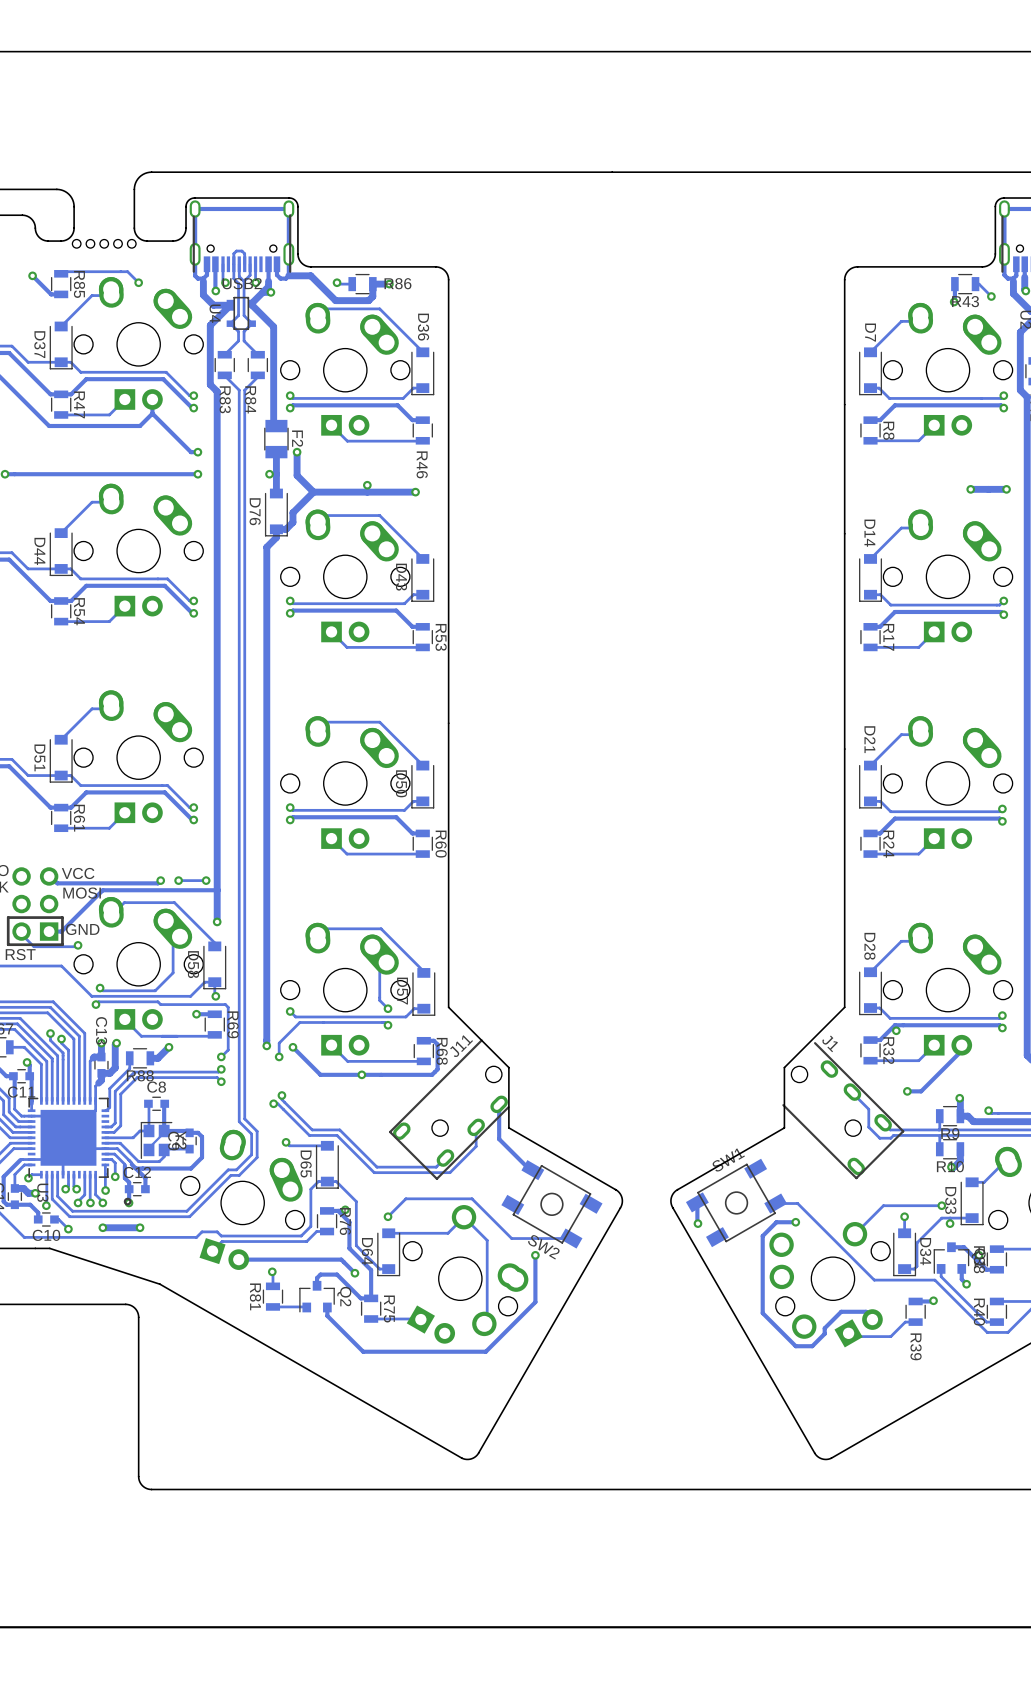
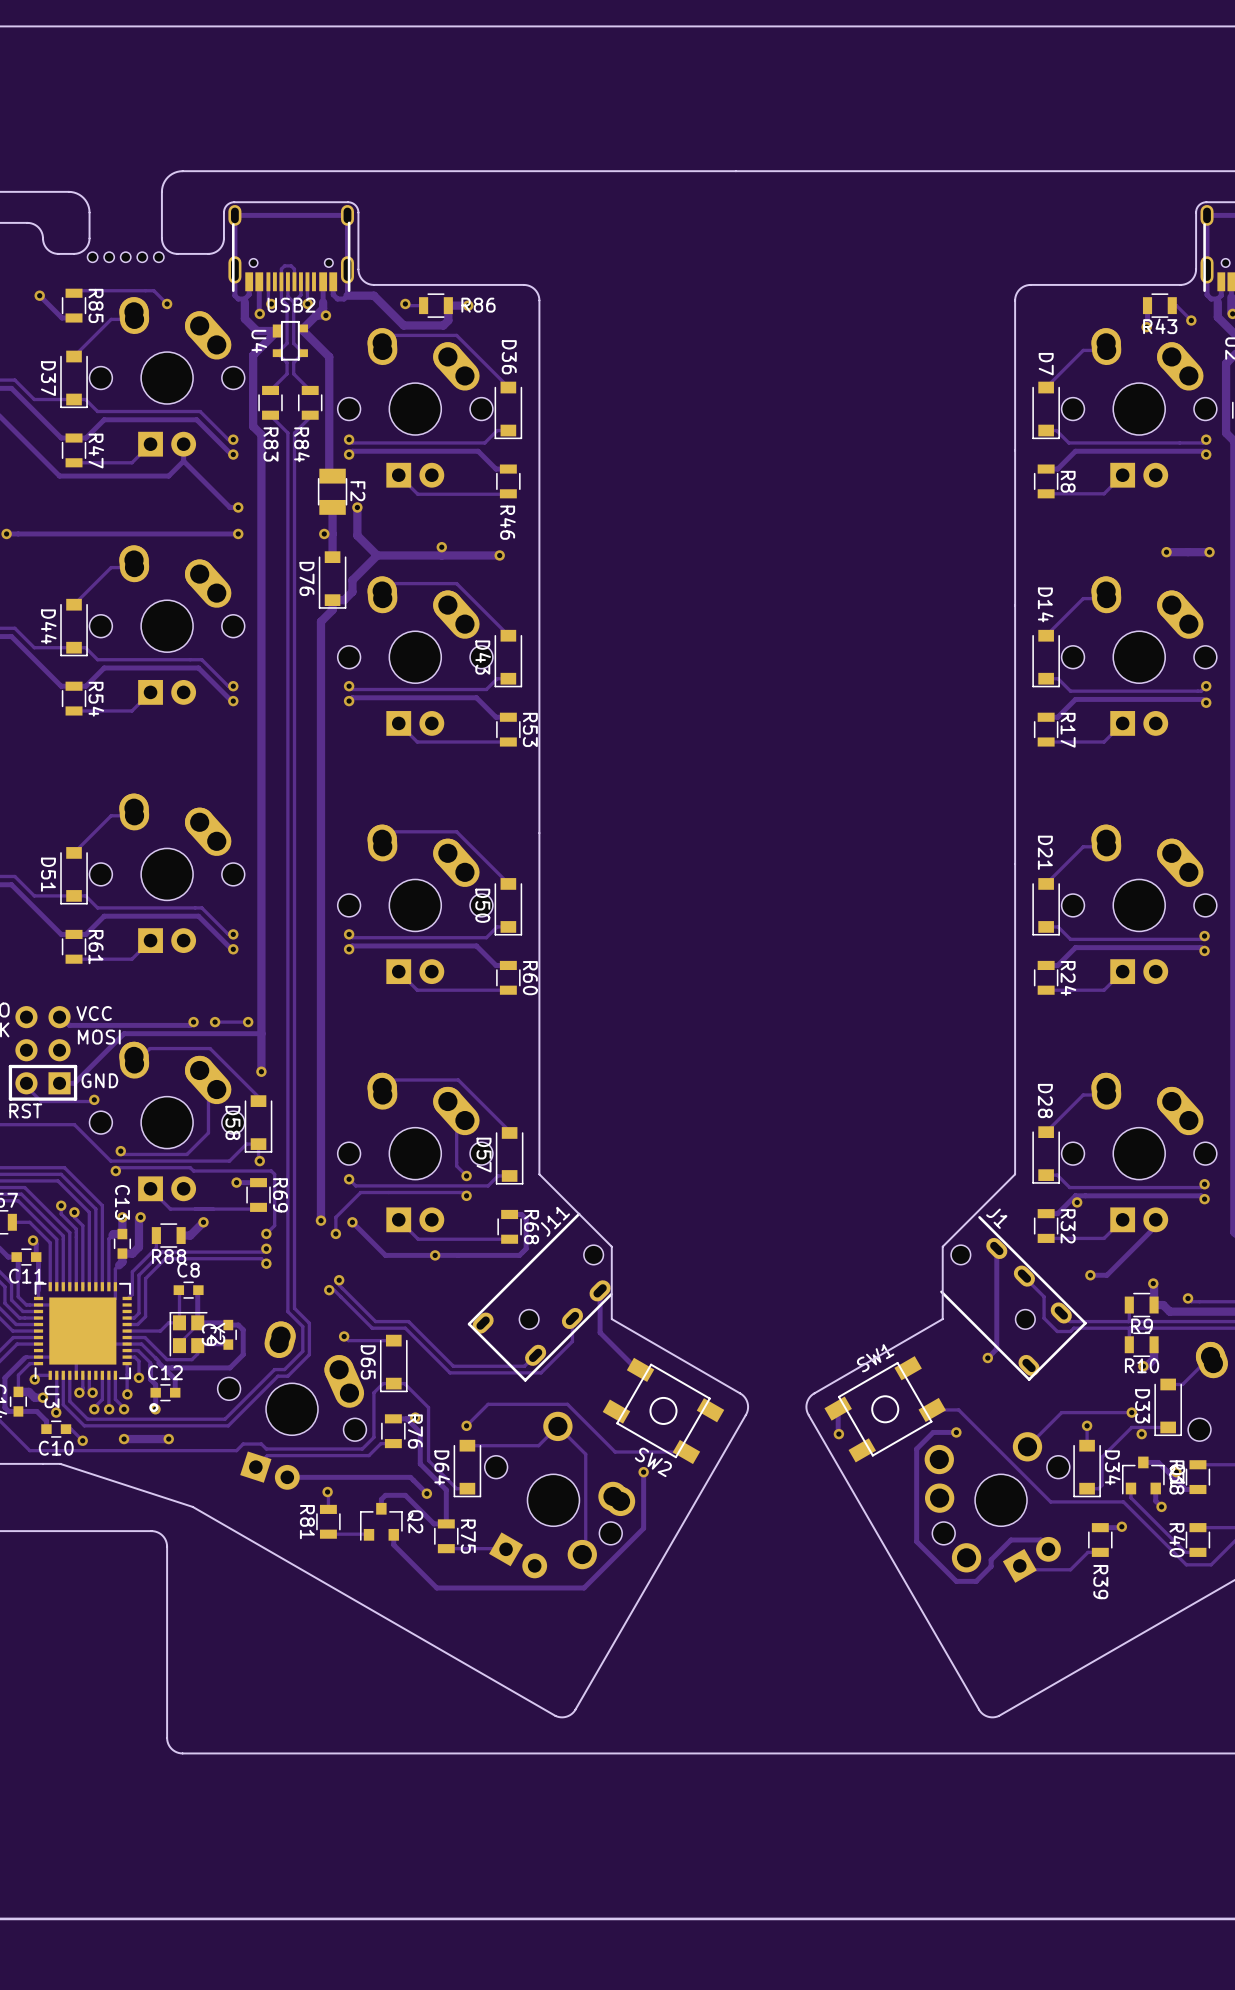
track: none -> (996, 1248) (996, 1349) (987, 1357)
via: none -> (987, 1357)

